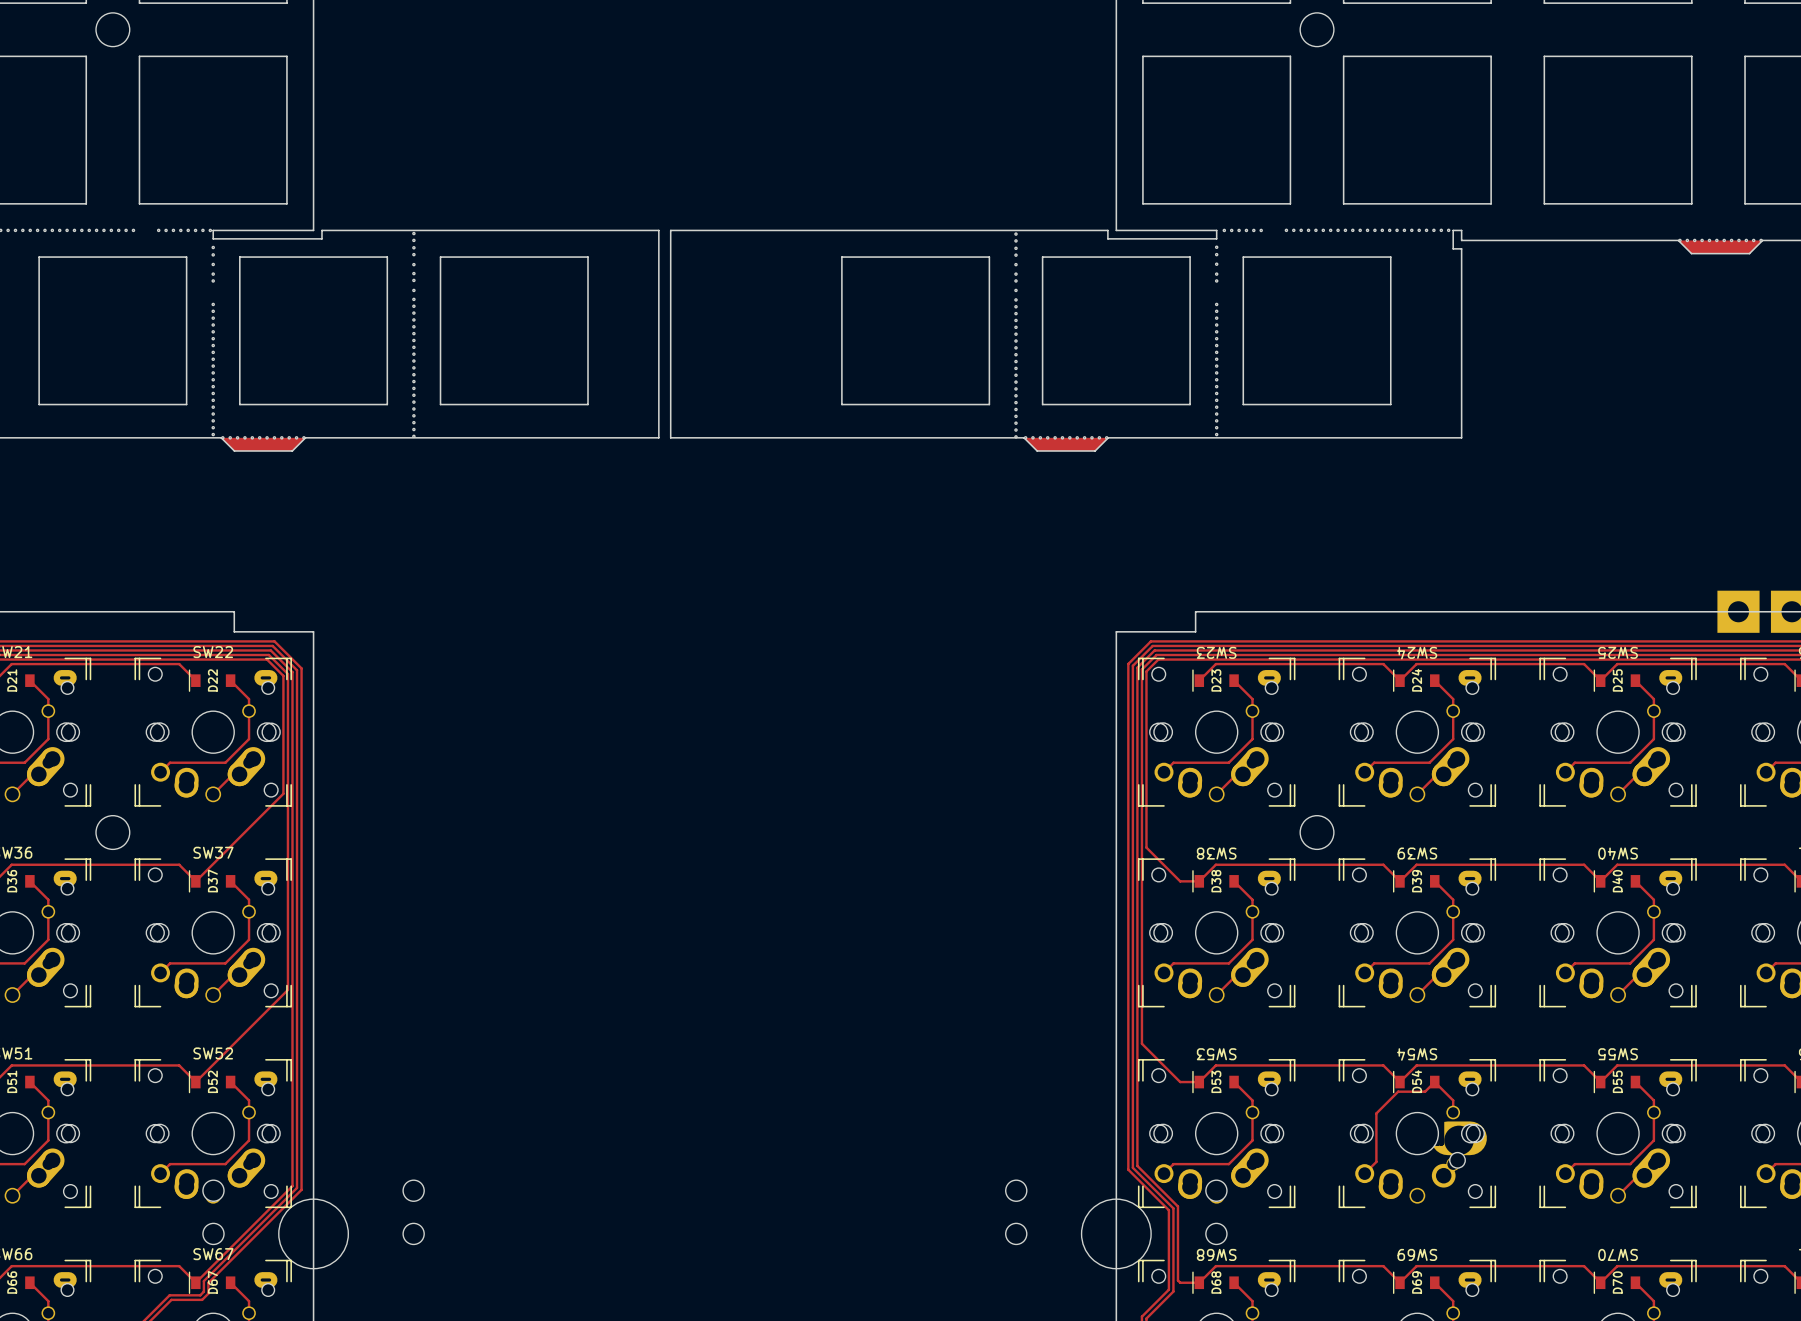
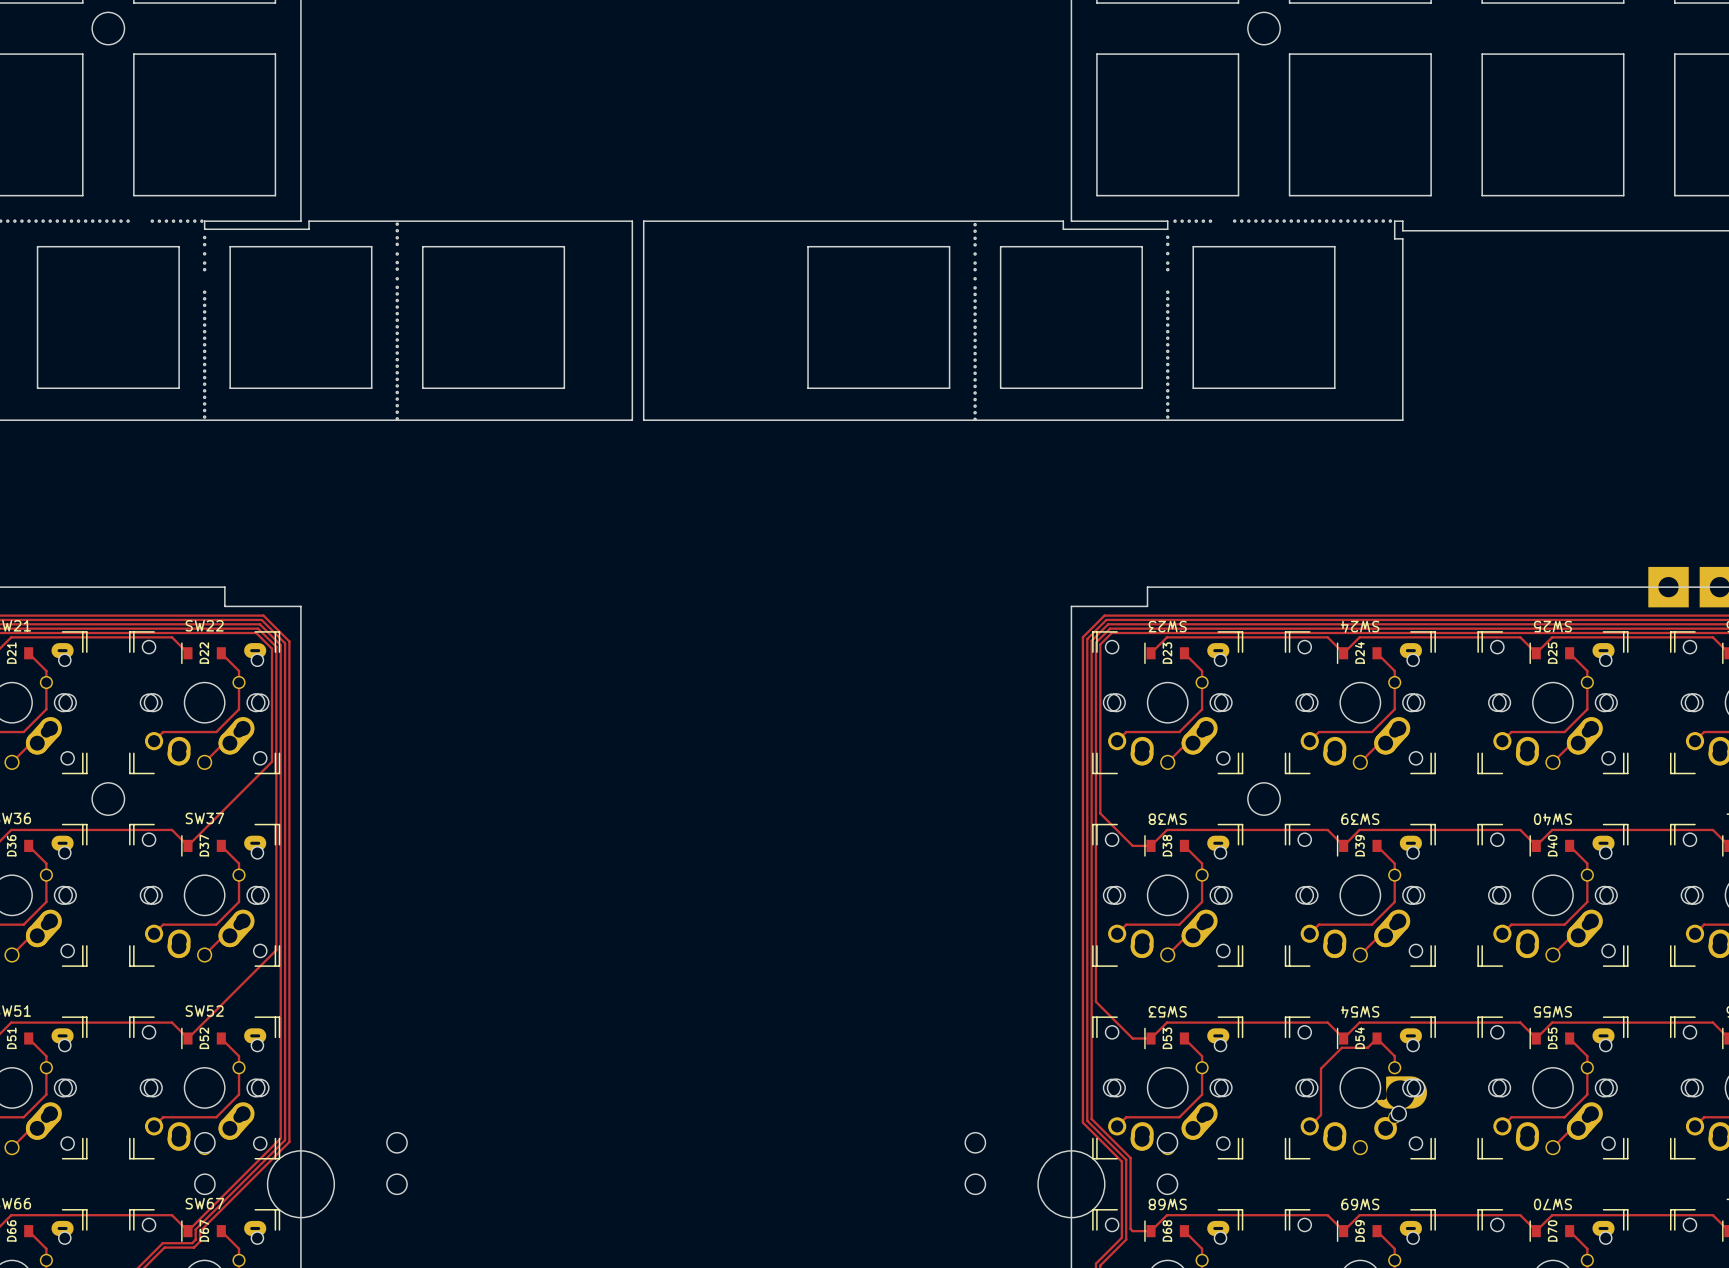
board edge: none -> (1610, 230) (1691, 230)
part: (1720, 246) -> none
board edge: none -> (212, 420) (293, 420)
board edge: none -> (982, 420) (1063, 420)
part: (263, 444) -> none
part: (1066, 444) -> none

